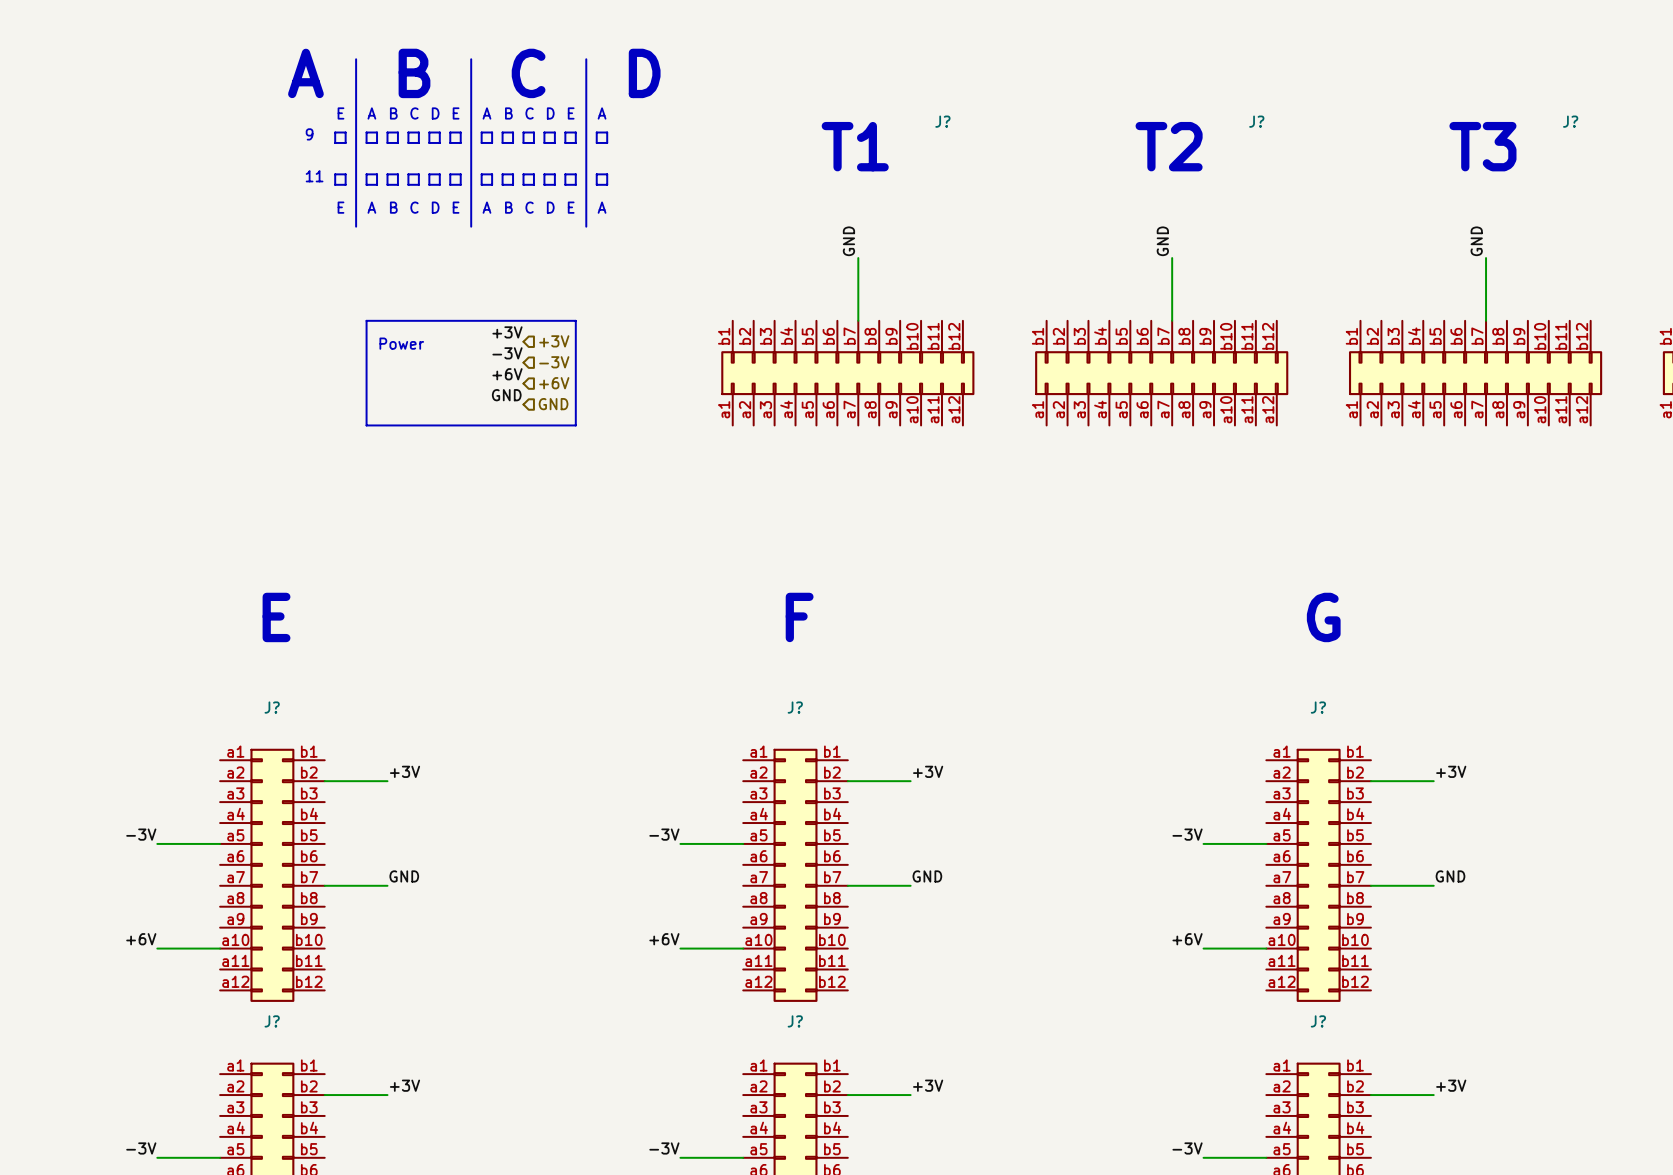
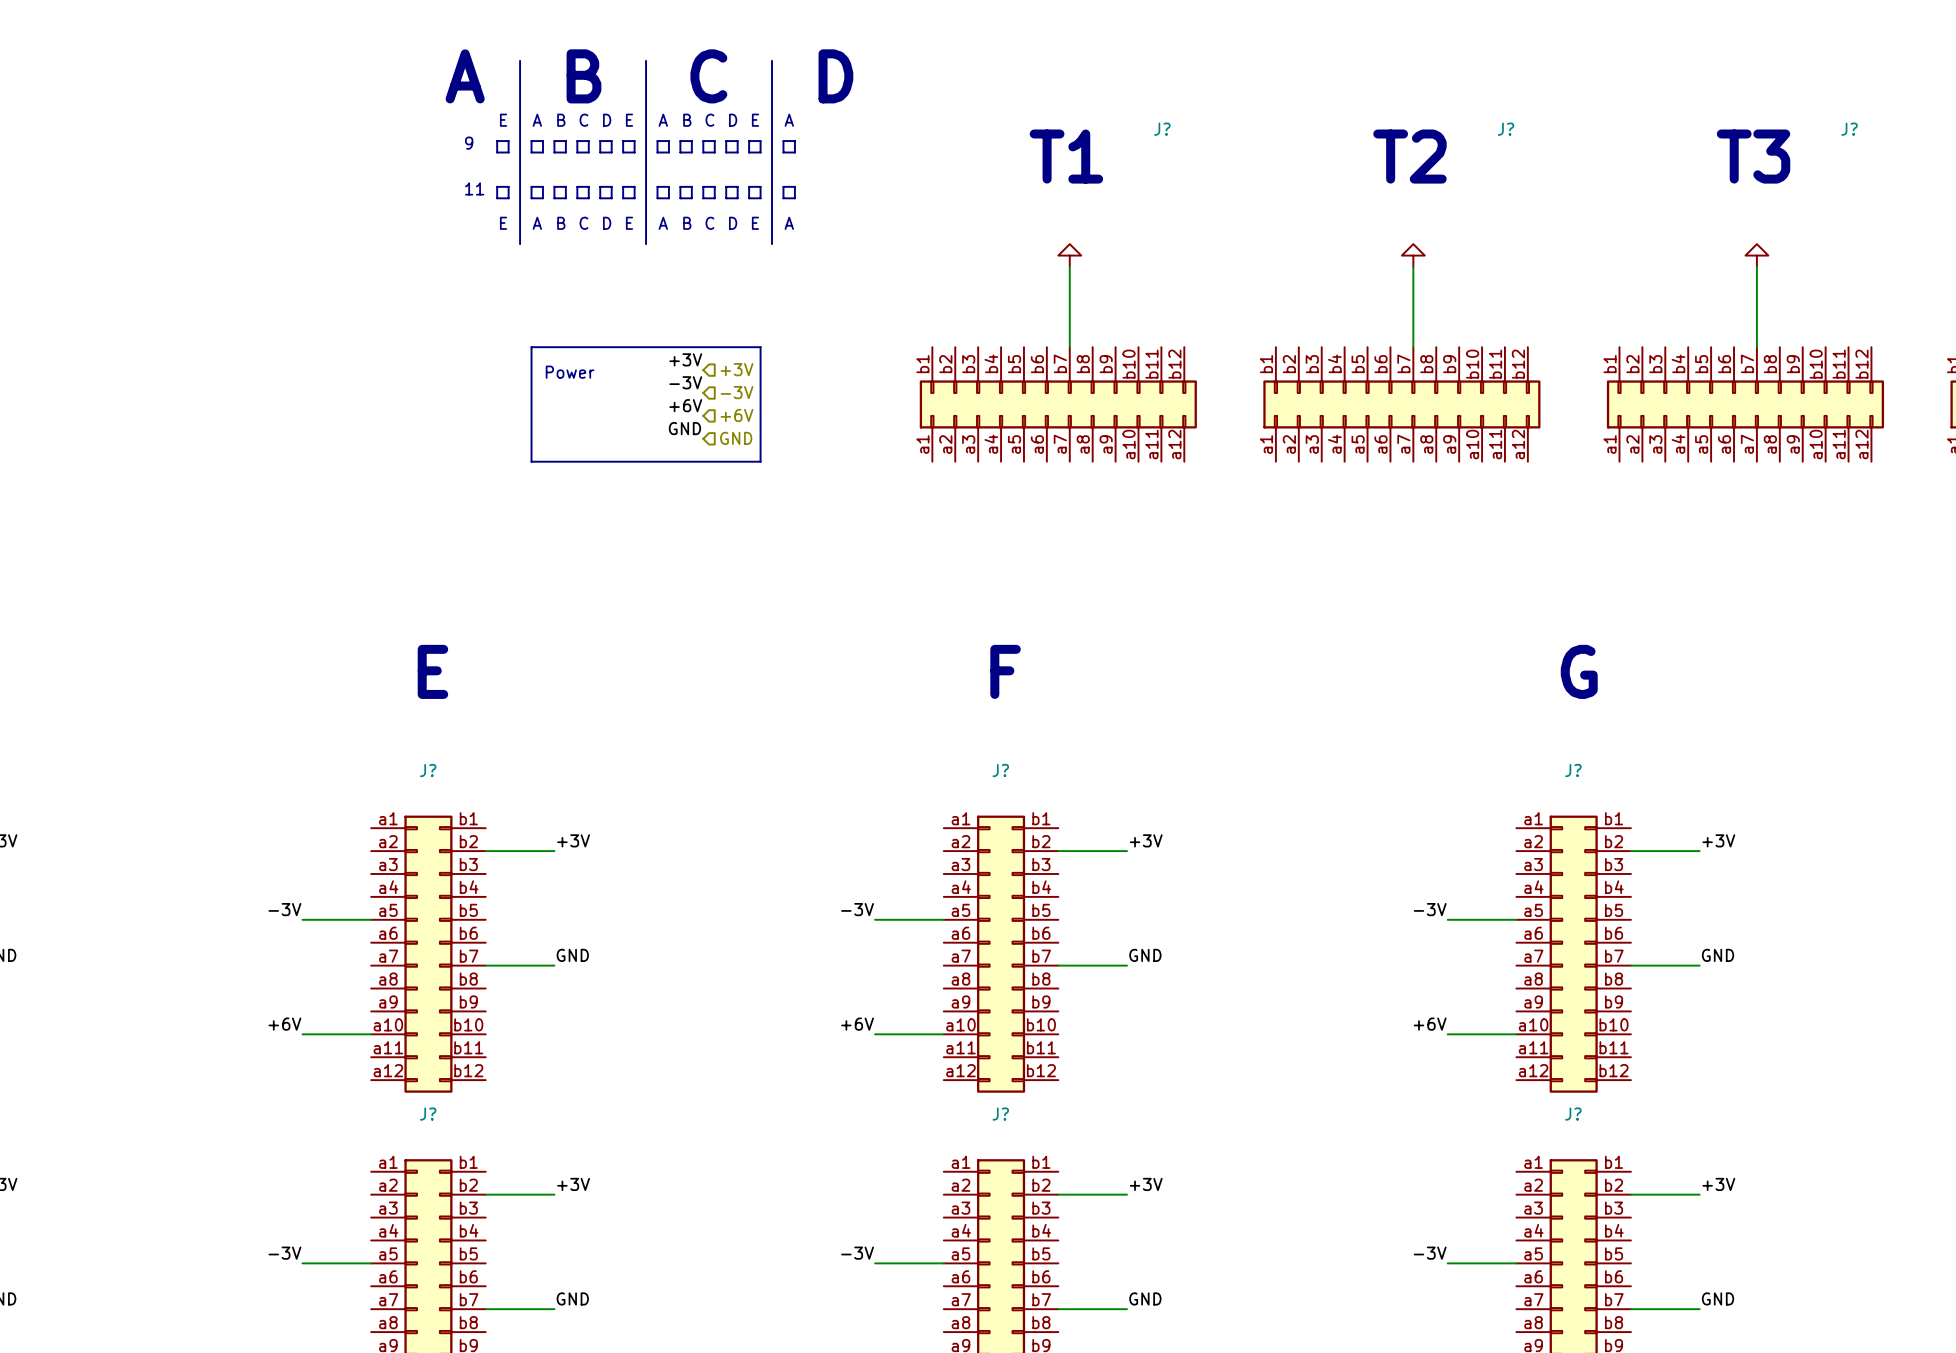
power symbol: none -> (1069, 255)
power symbol: none -> (1413, 255)
power symbol: none -> (1756, 255)
label: GND (848, 241) -> none
label: GND (1162, 241) -> none
label: GND (1476, 241) -> none
wire: none -> (1069, 267) (1069, 278)
wire: none -> (1413, 267) (1413, 278)
wire: none -> (1756, 267) (1756, 278)

